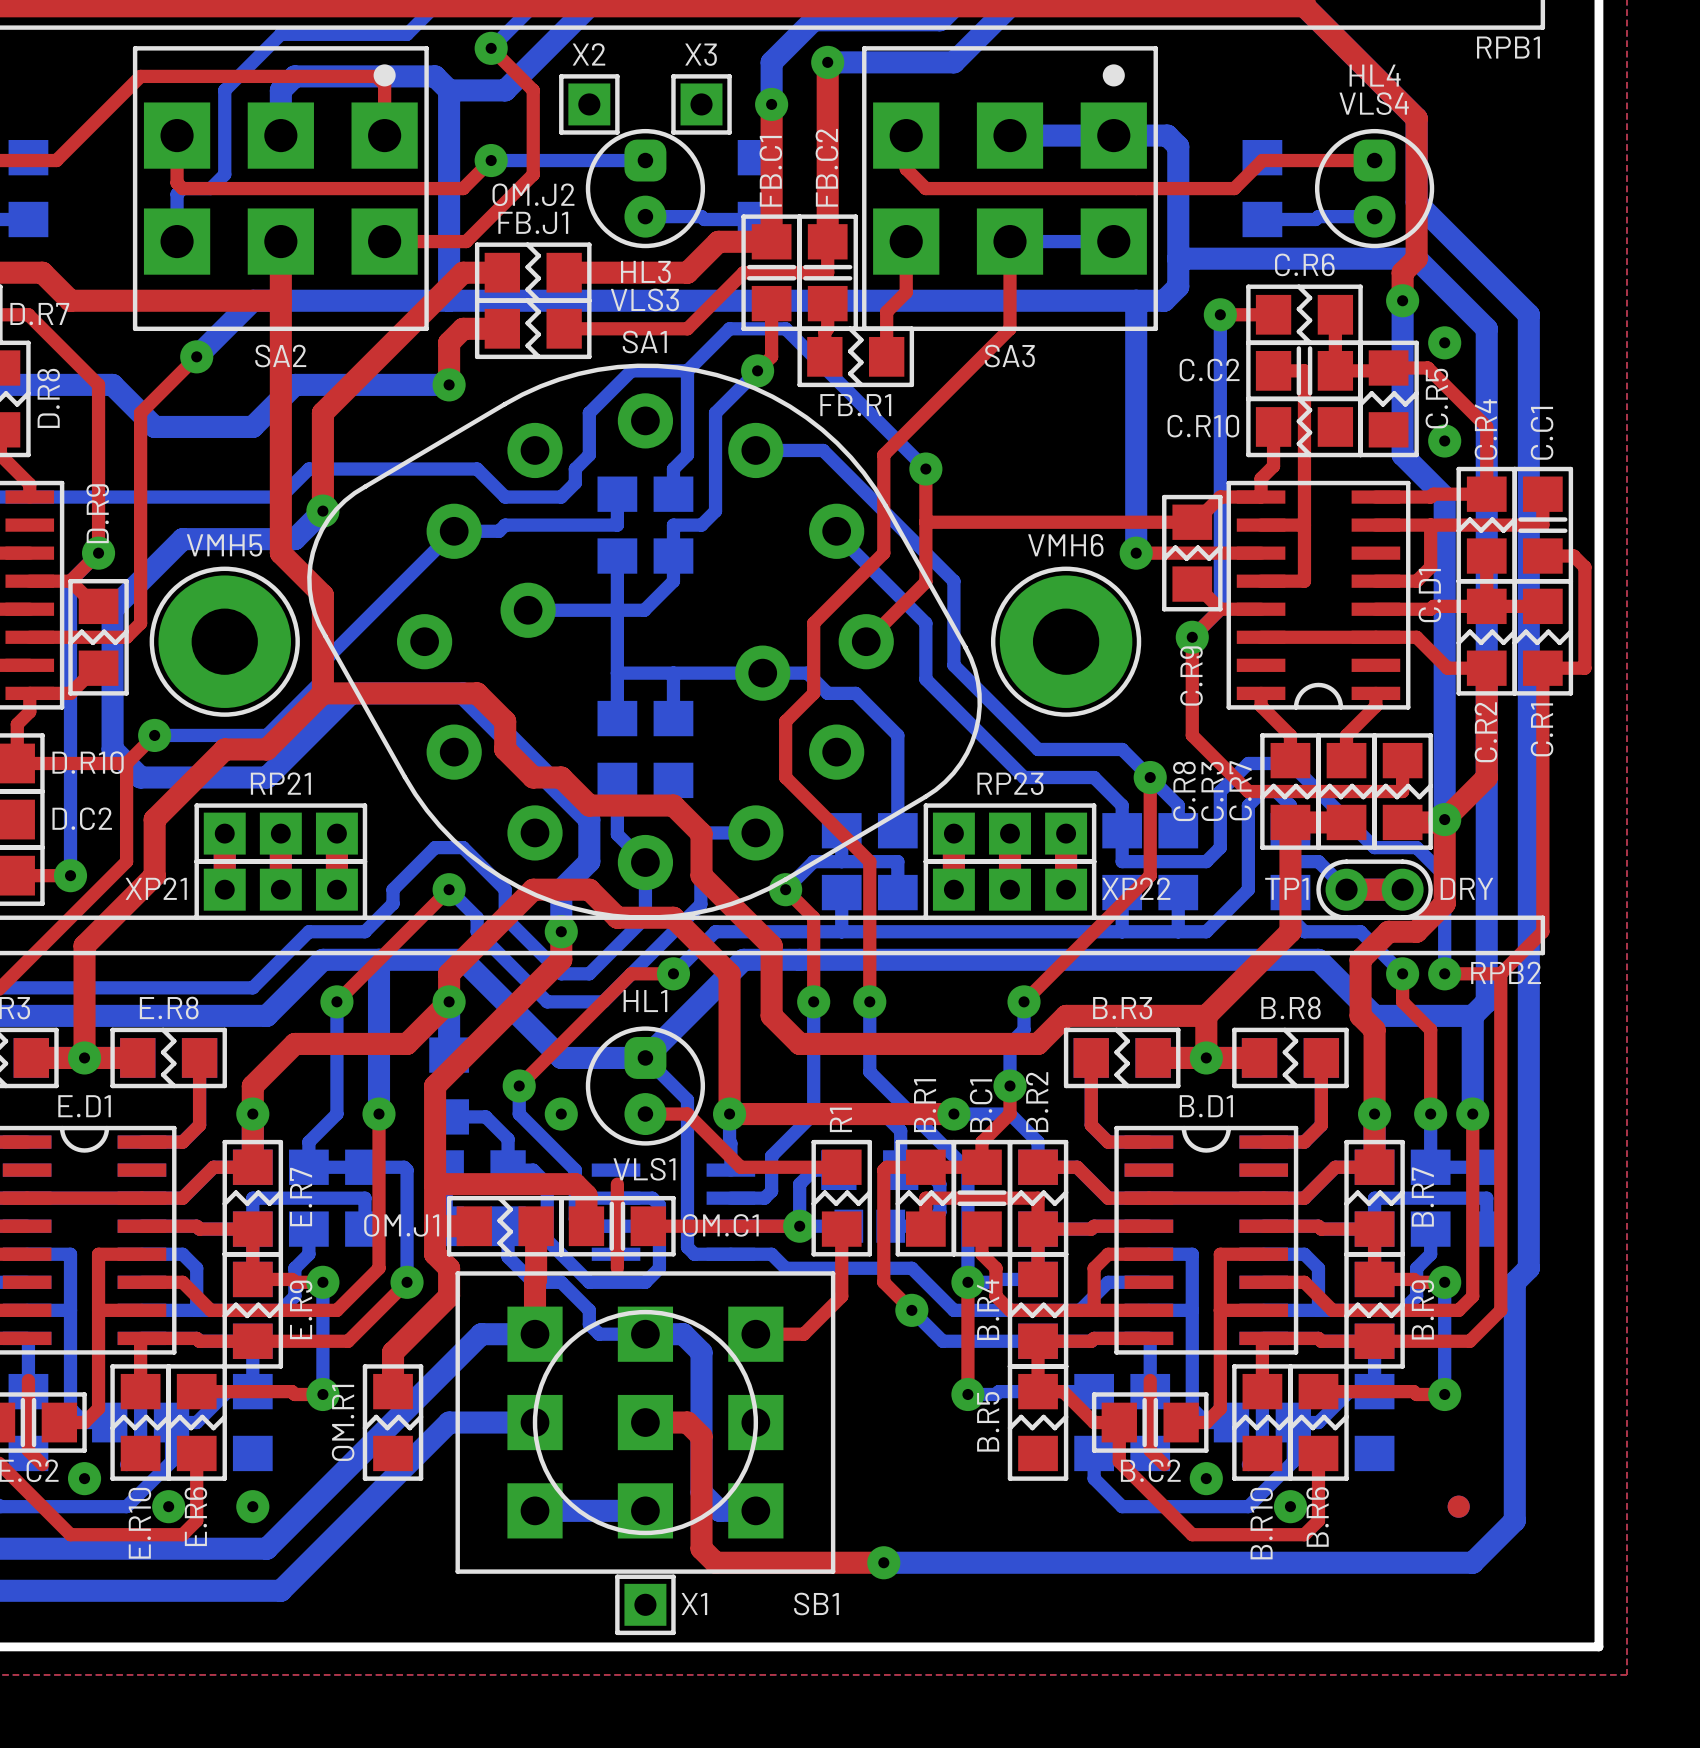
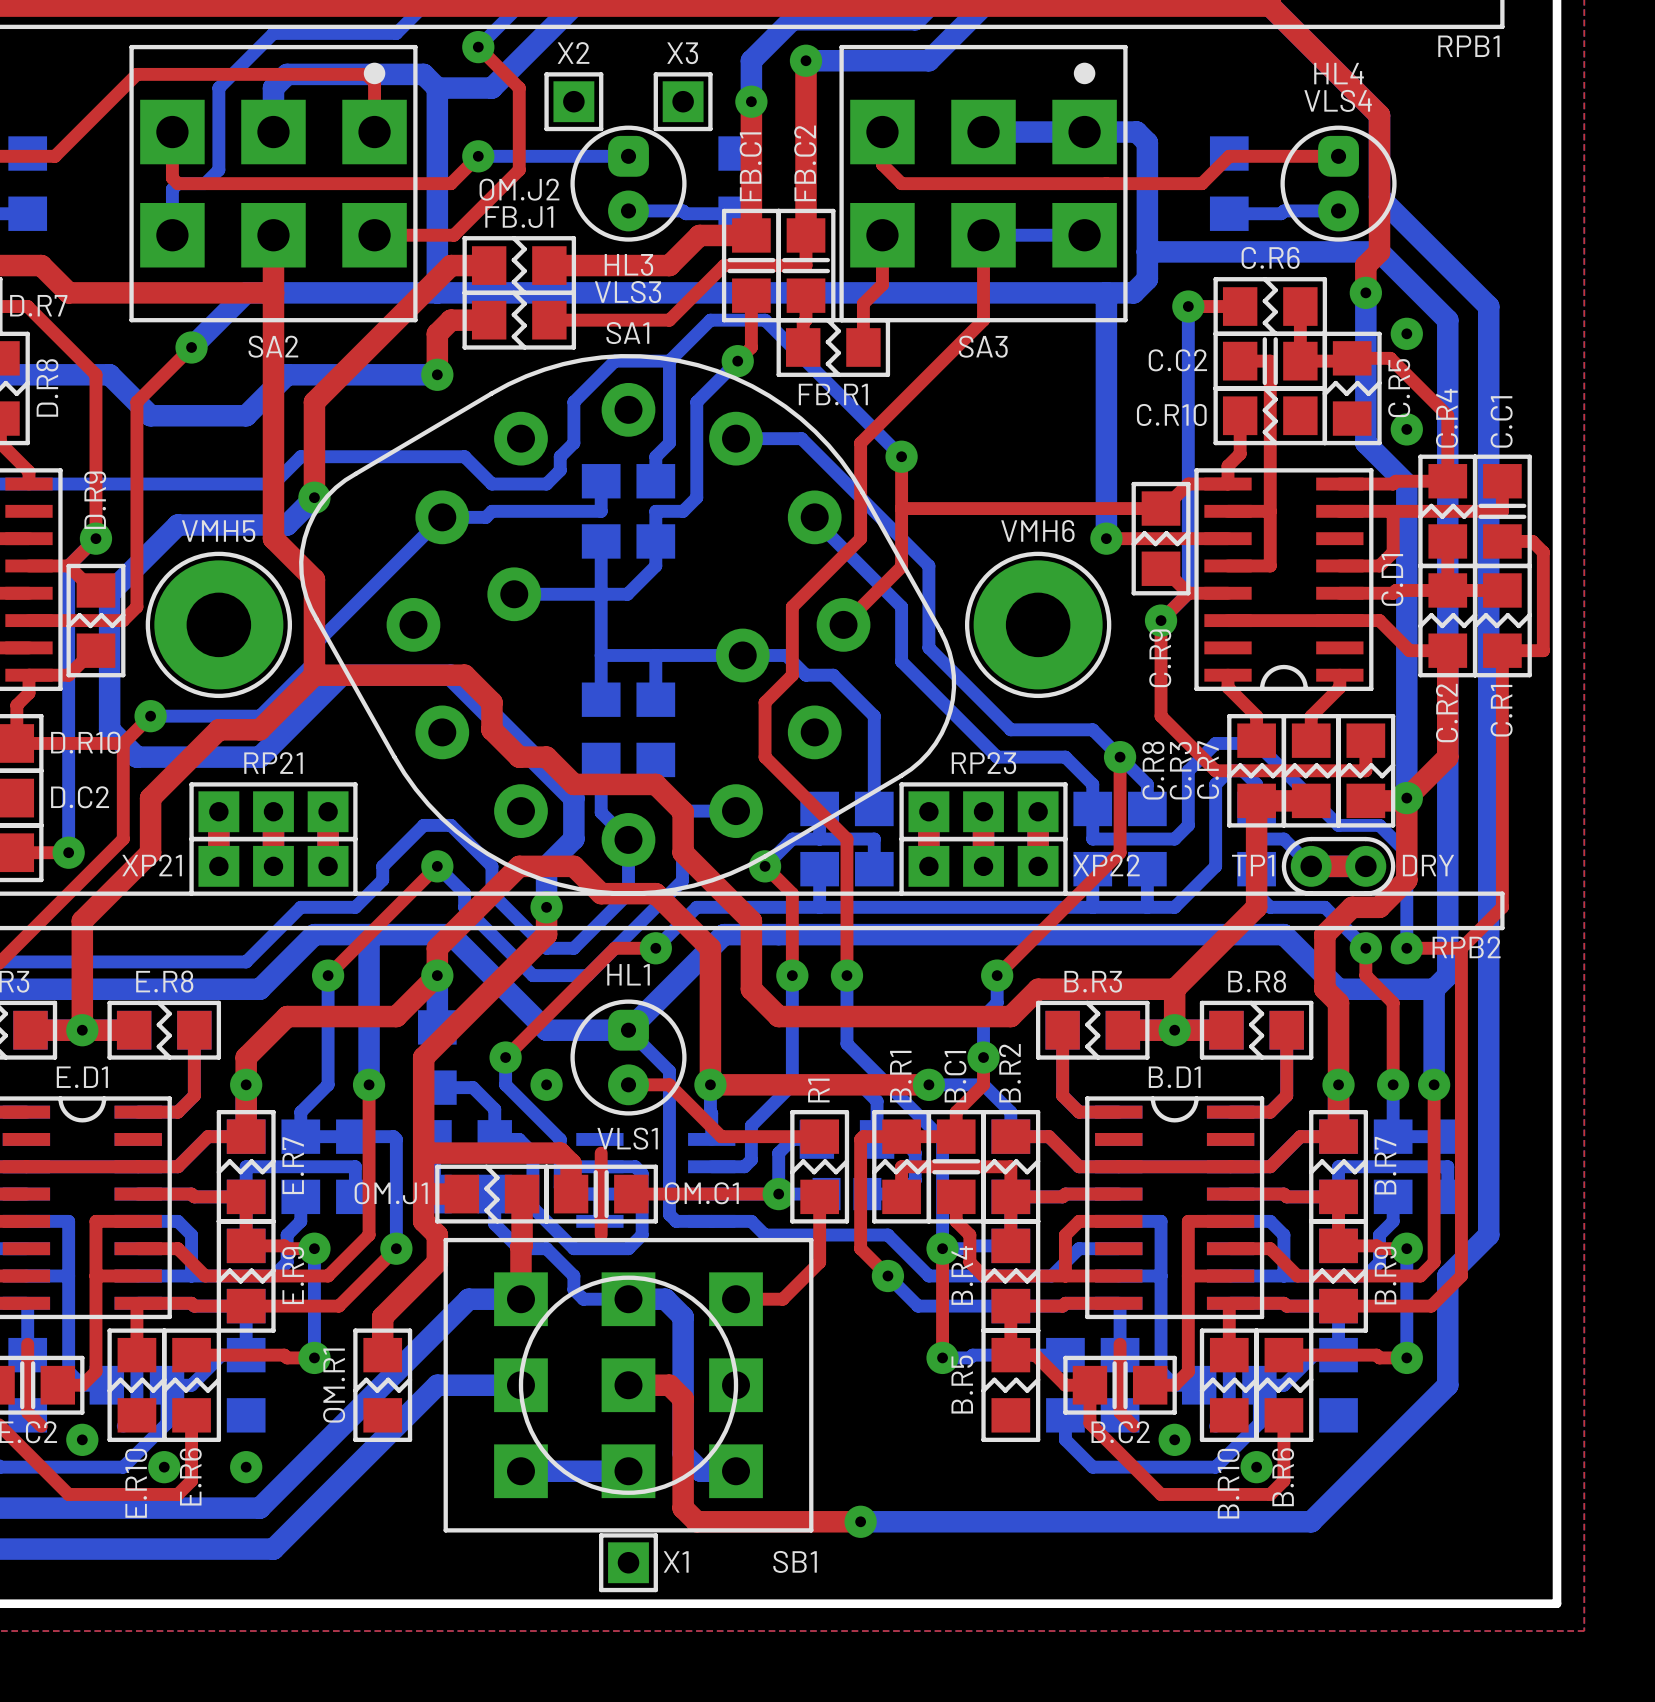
bottom track: (1514, 1282) (1514, 1520) (1472, 1562) (1346, 1562) -> (1475, 1248) (1447, 1276) (1447, 1385) (1311, 1521)
part: (1458, 1506) -> none

